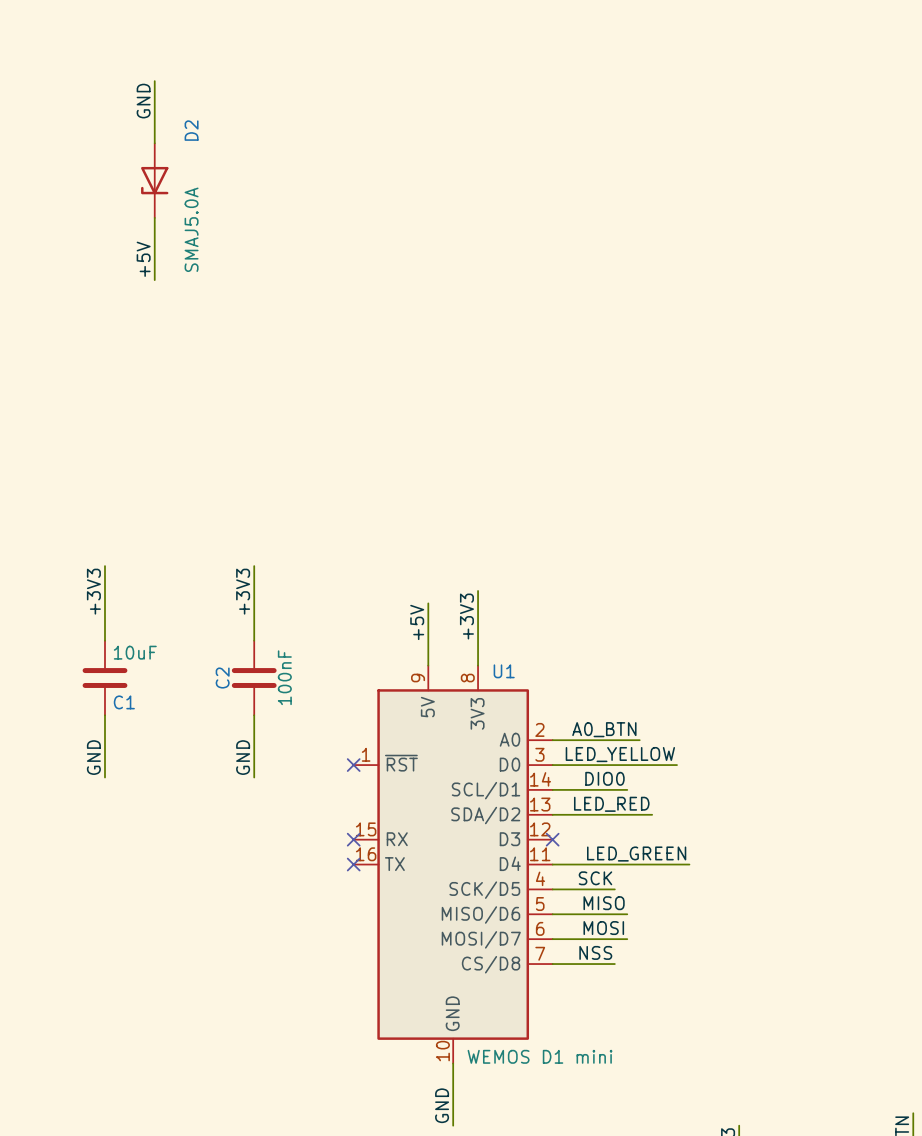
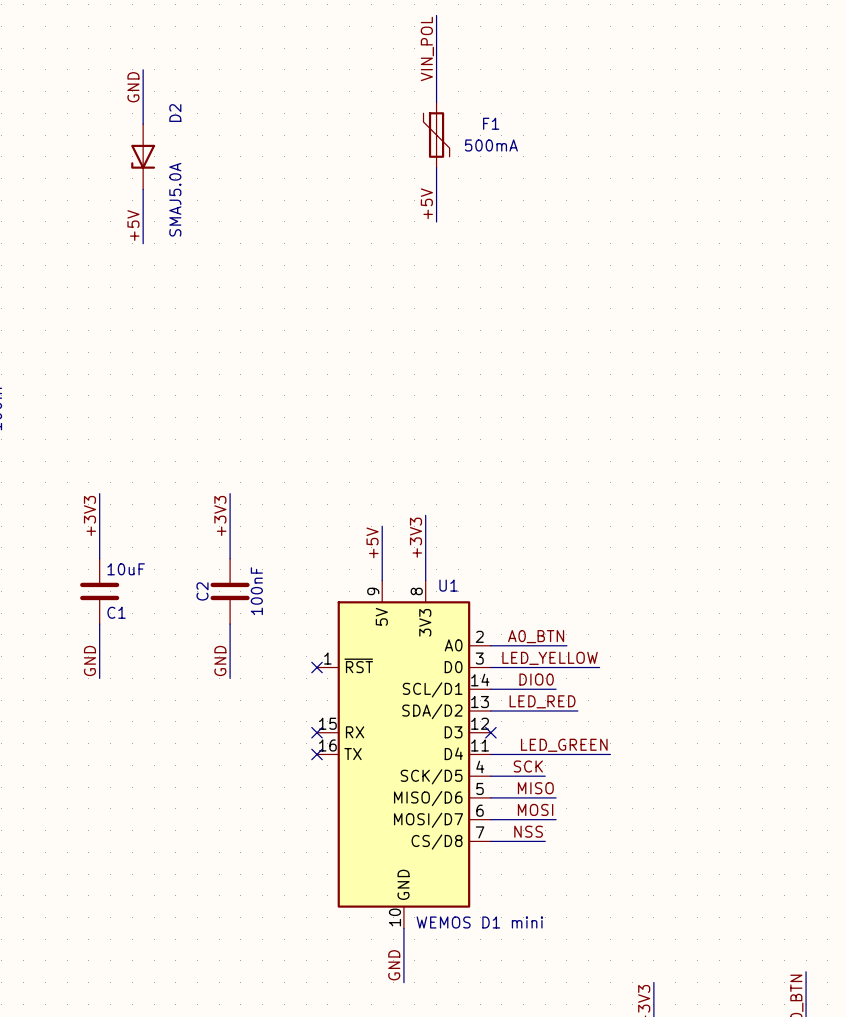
wire: none -> (436, 15) (436, 102)
label: none -> VIN_POL (427, 48)
F1: none -> 500mA (436, 135)
wire: none -> (436, 167) (436, 221)
label: none -> +5V (426, 203)

